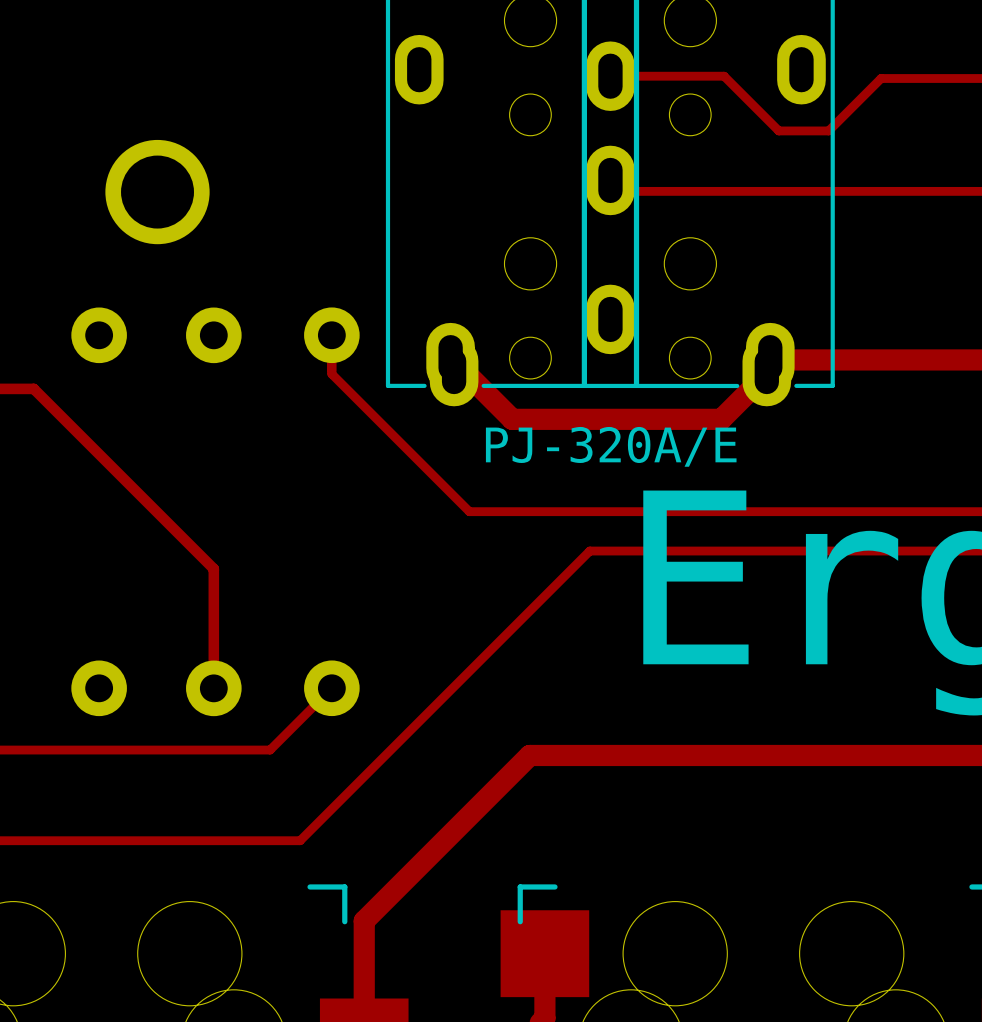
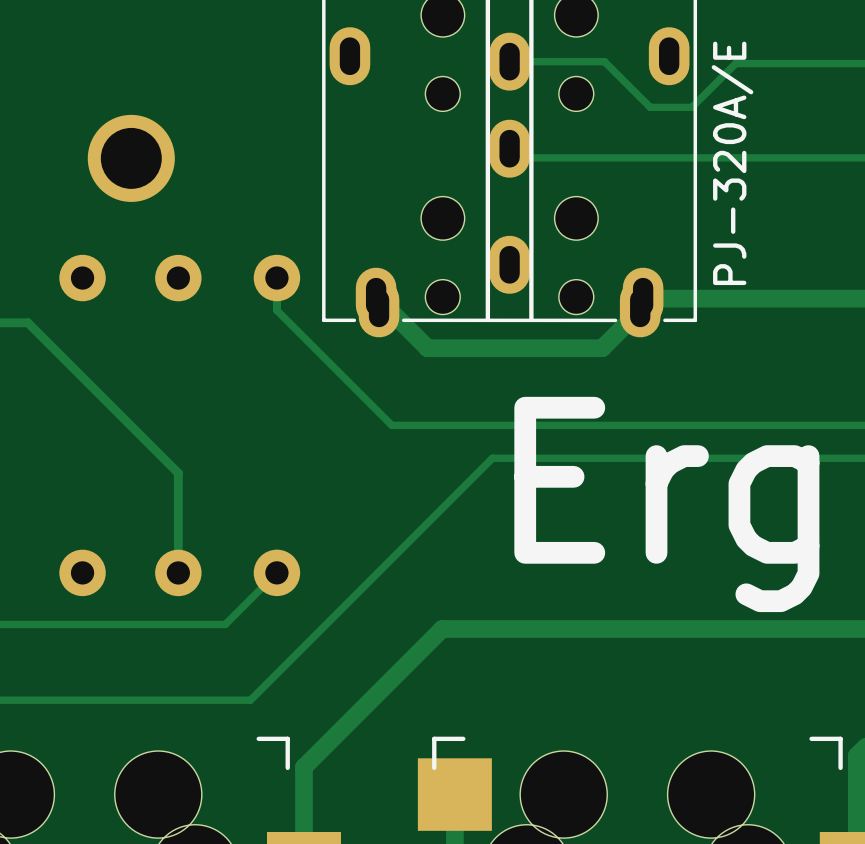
part text rotation: 0° (611, 446) -> 90° counterclockwise (732, 163)
part text position: PJ-320A/E (611, 446) -> PJ-320A/E (732, 163)

